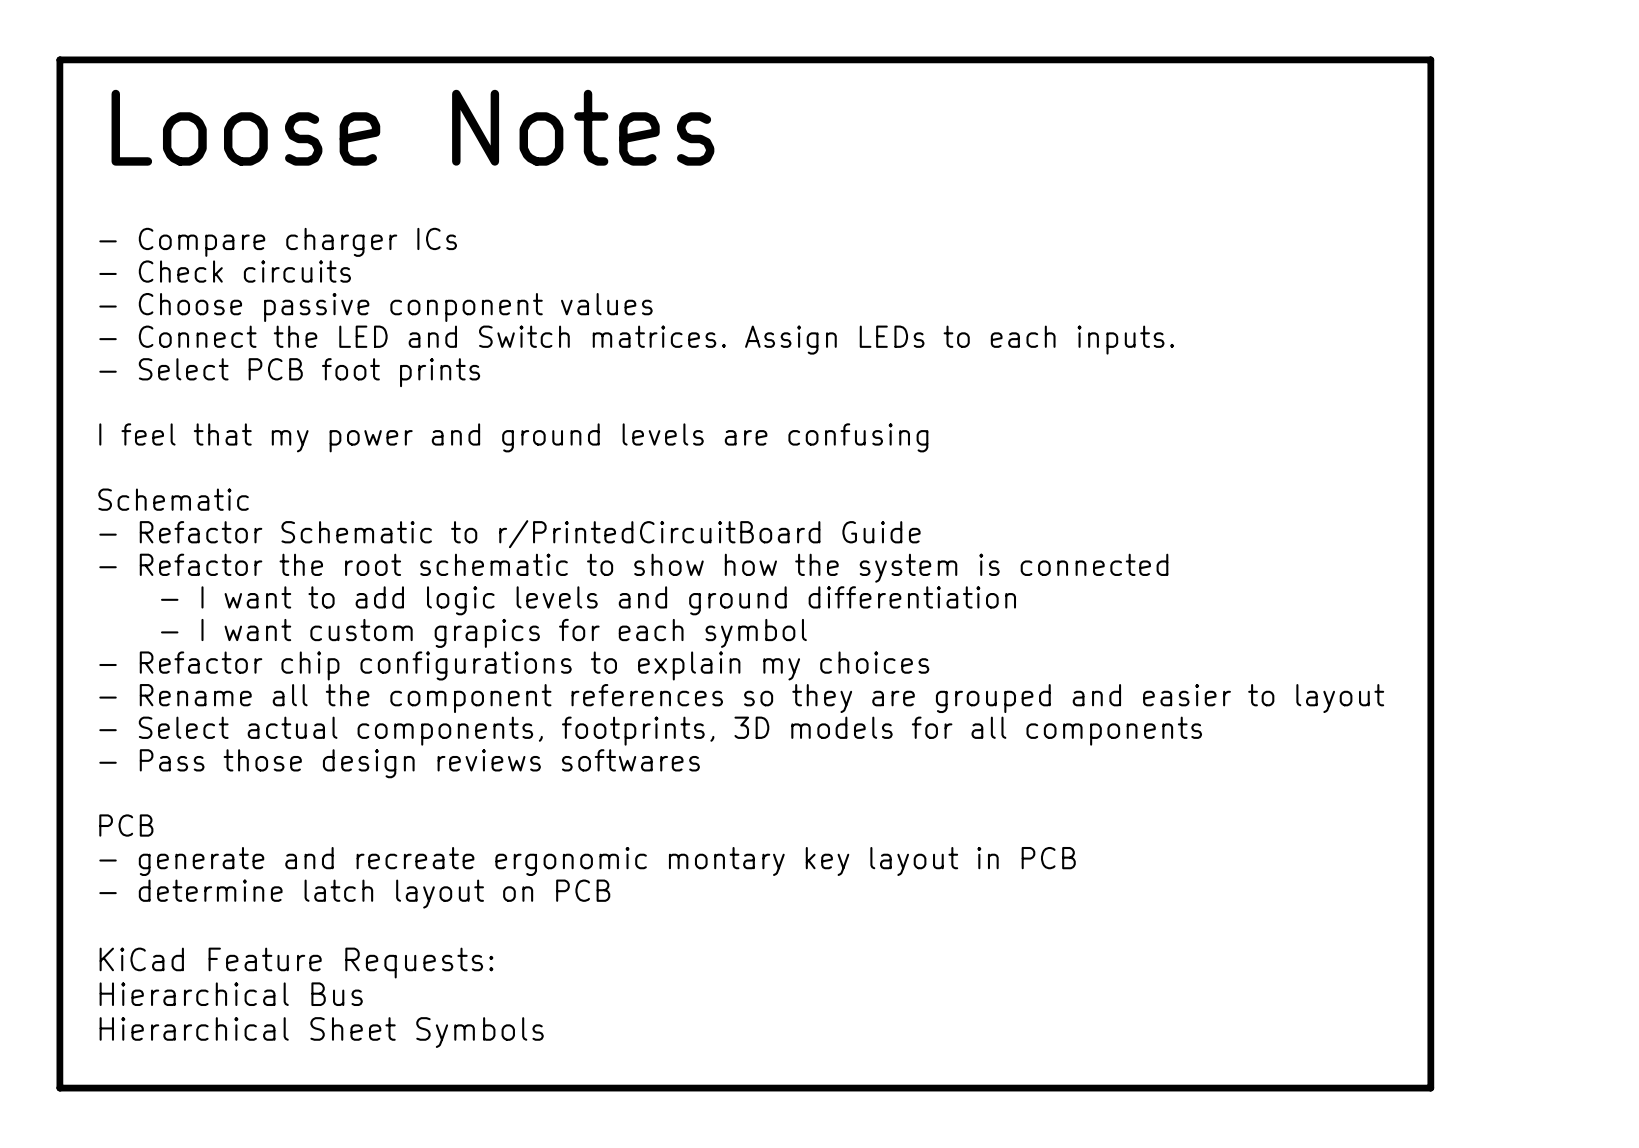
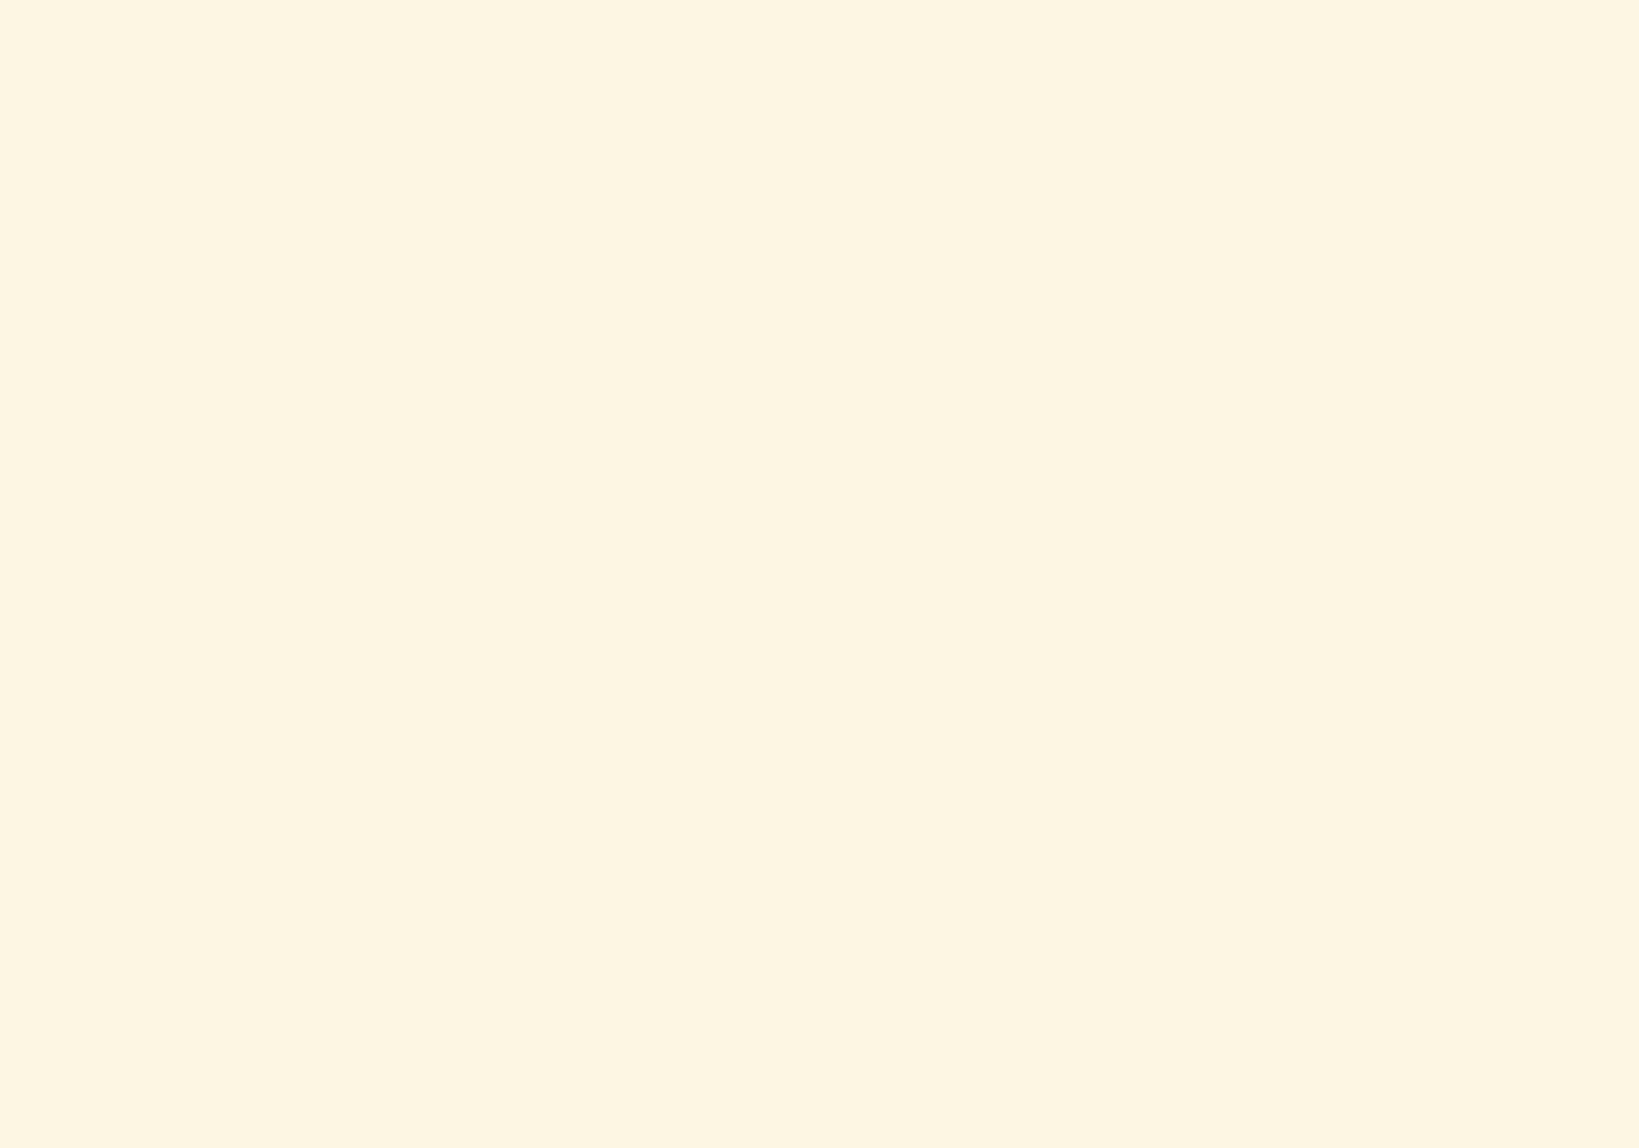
line: (59, 59) (1430, 59) (1430, 1088) (59, 1088) (59, 59) -> none
text: Loose Notes (412, 127) -> none
text: - Compare charger ICs (278, 242) -> none
text: - Check circuits (225, 271) -> none
text: - Choose passive conponent values (375, 307) -> none
text: - Connect the LED and Switch matrices. Assign LEDs to each inputs. (636, 340) -> none
text: - Select PCB foot prints (289, 372) -> none
text: I feel that my power and ground levels are confusing (513, 437) -> none
text: Schematic (173, 499) -> none
text: - Refactor Schematic to r/PrintedCircuitBoard Guide (509, 534) -> none
text: - Refactor the root schematic to show how the system is connected (633, 568) -> none
text: - I want to add logic levels and ground differentiation (588, 600) -> none
text: - I want custom grapics for each symbol (483, 633) -> none
text: - Refactor chip configurations to explain my choices (514, 665) -> none
text: - Rename all the component references so they are grouped and easier to layout (741, 698) -> none
text: - Select actual components, footprints, 3D models for all components (650, 731) -> none
text: - Pass those design reviews softwares (399, 763) -> none
text: PCB (126, 825) -> none
text: - generate and recreate ergonomic montary key layout in PCB (587, 861) -> none
text: - determine latch layout on PCB (354, 894) -> none
text: KiCad Feature Requests: (296, 963) -> none
text: Hierarchical Bus (231, 994) -> none
text: Hierarchical Sheet Symbols (321, 1032) -> none

